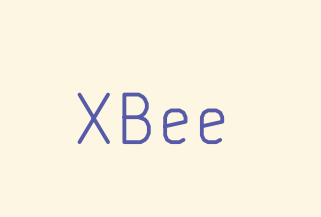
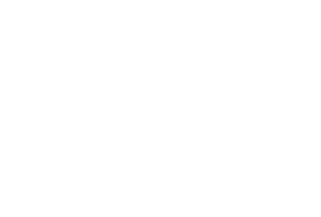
text: XBee (150, 118) -> none

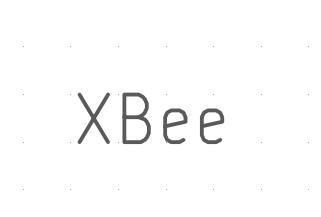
text: none -> XBee (150, 118)

